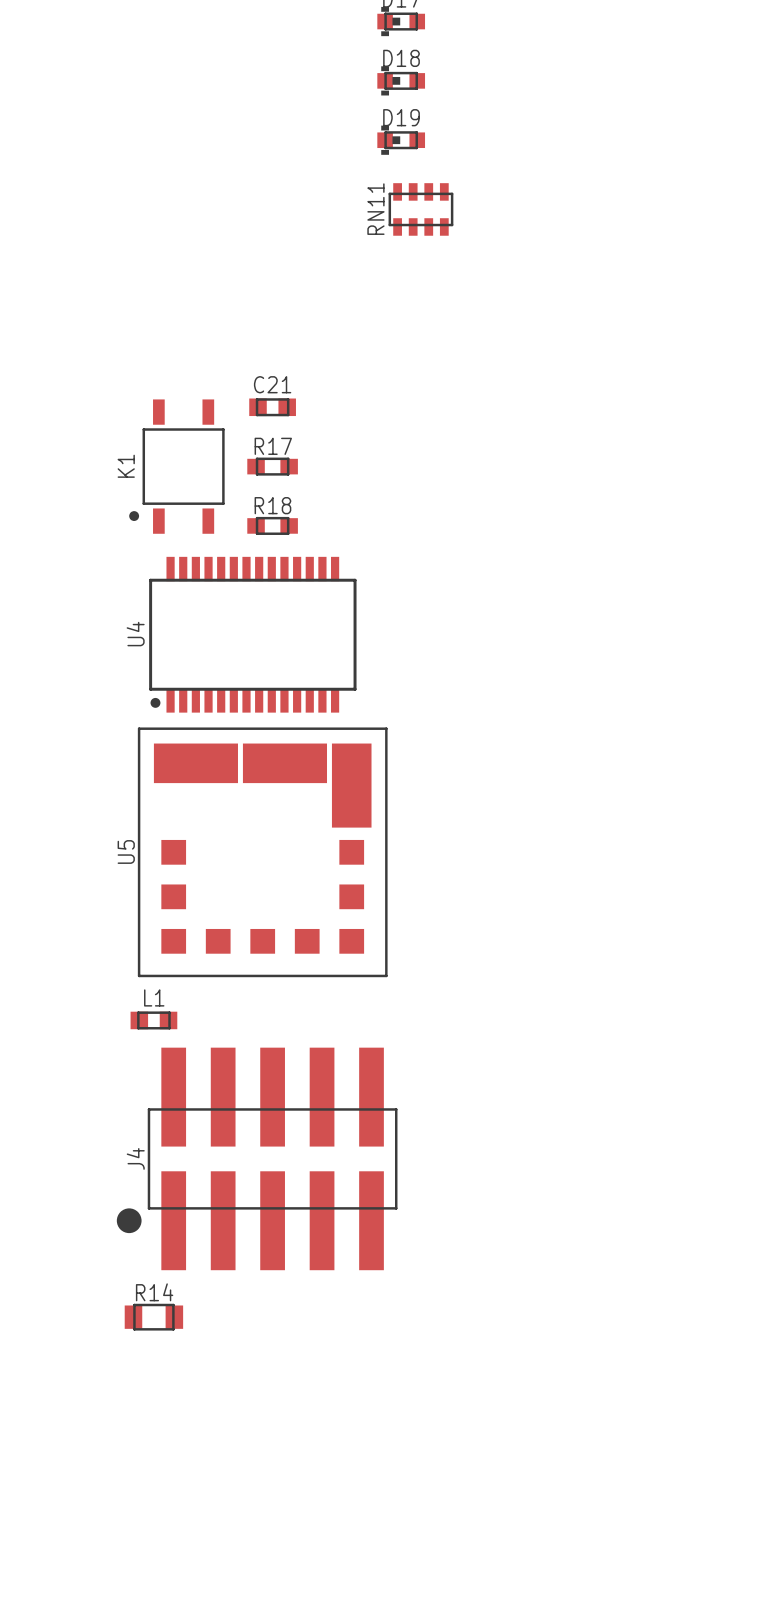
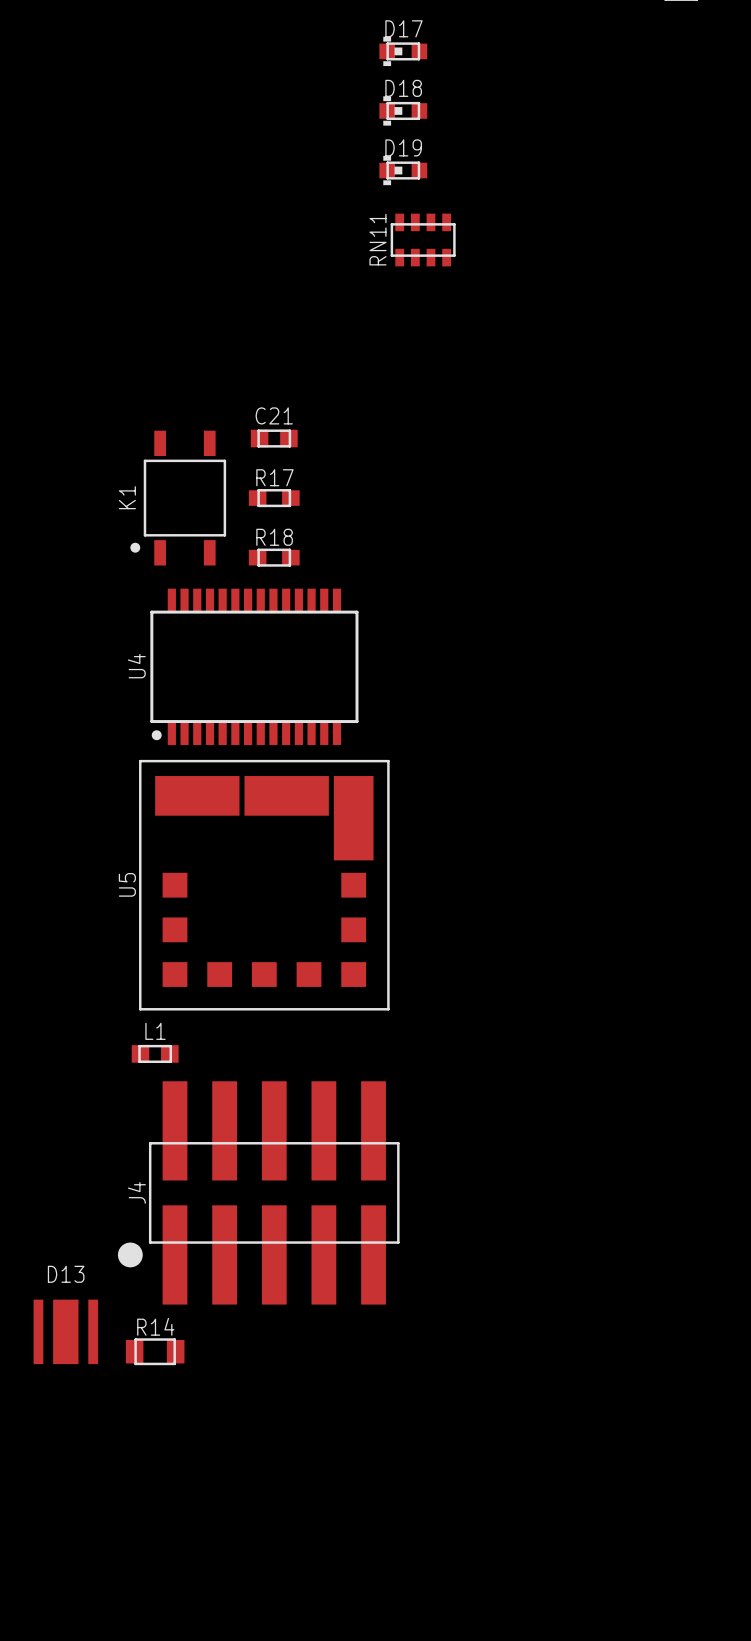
D13: none -> (65, 1331)

